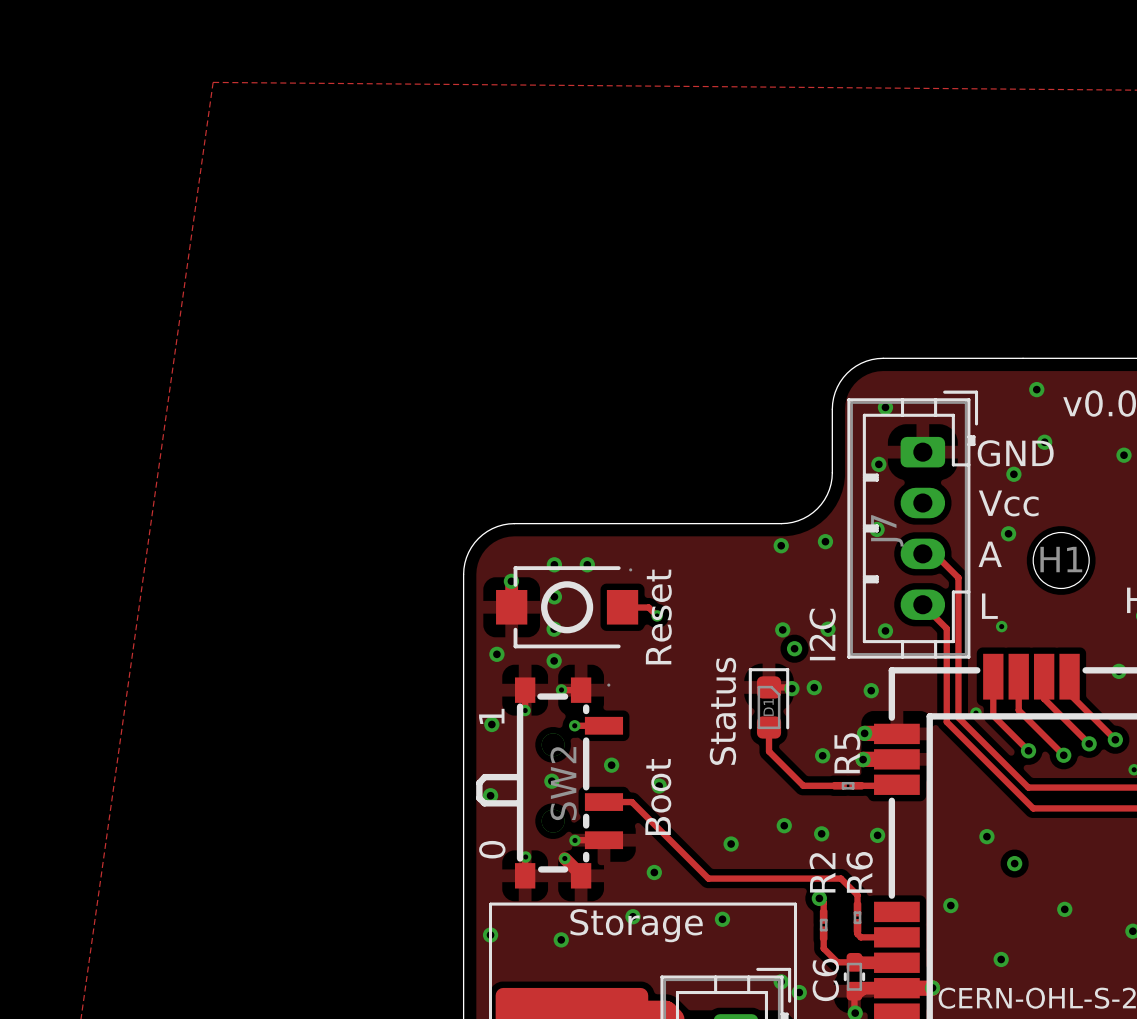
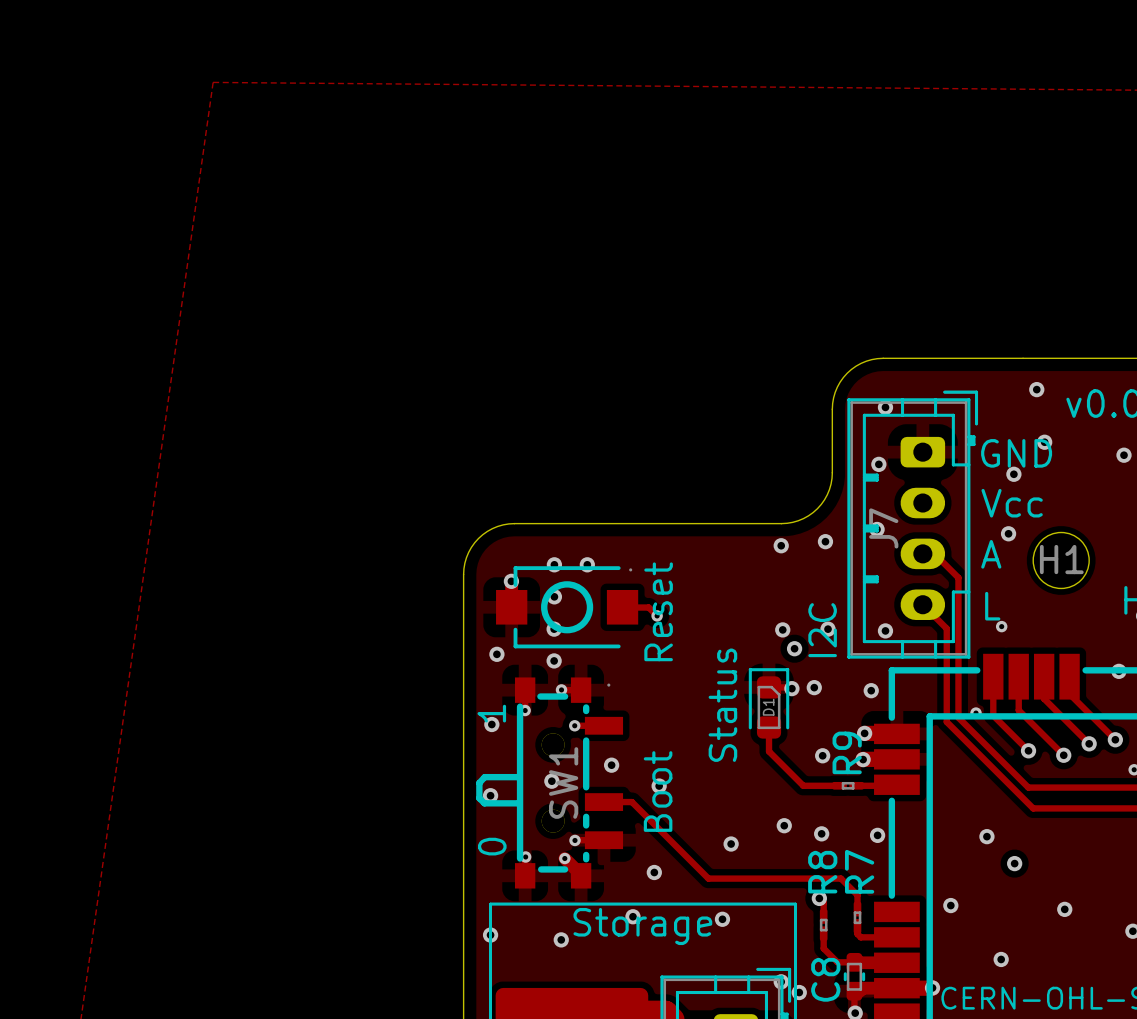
R5 name: R5 (847, 753) -> R9 (847, 752)
SW2 name: SW2 (563, 783) -> SW1 (563, 782)
R2 name: R2 (822, 872) -> R8 (822, 872)
R6 name: R6 (859, 872) -> R7 (859, 871)
C6 name: C6 (825, 979) -> C8 (825, 979)

